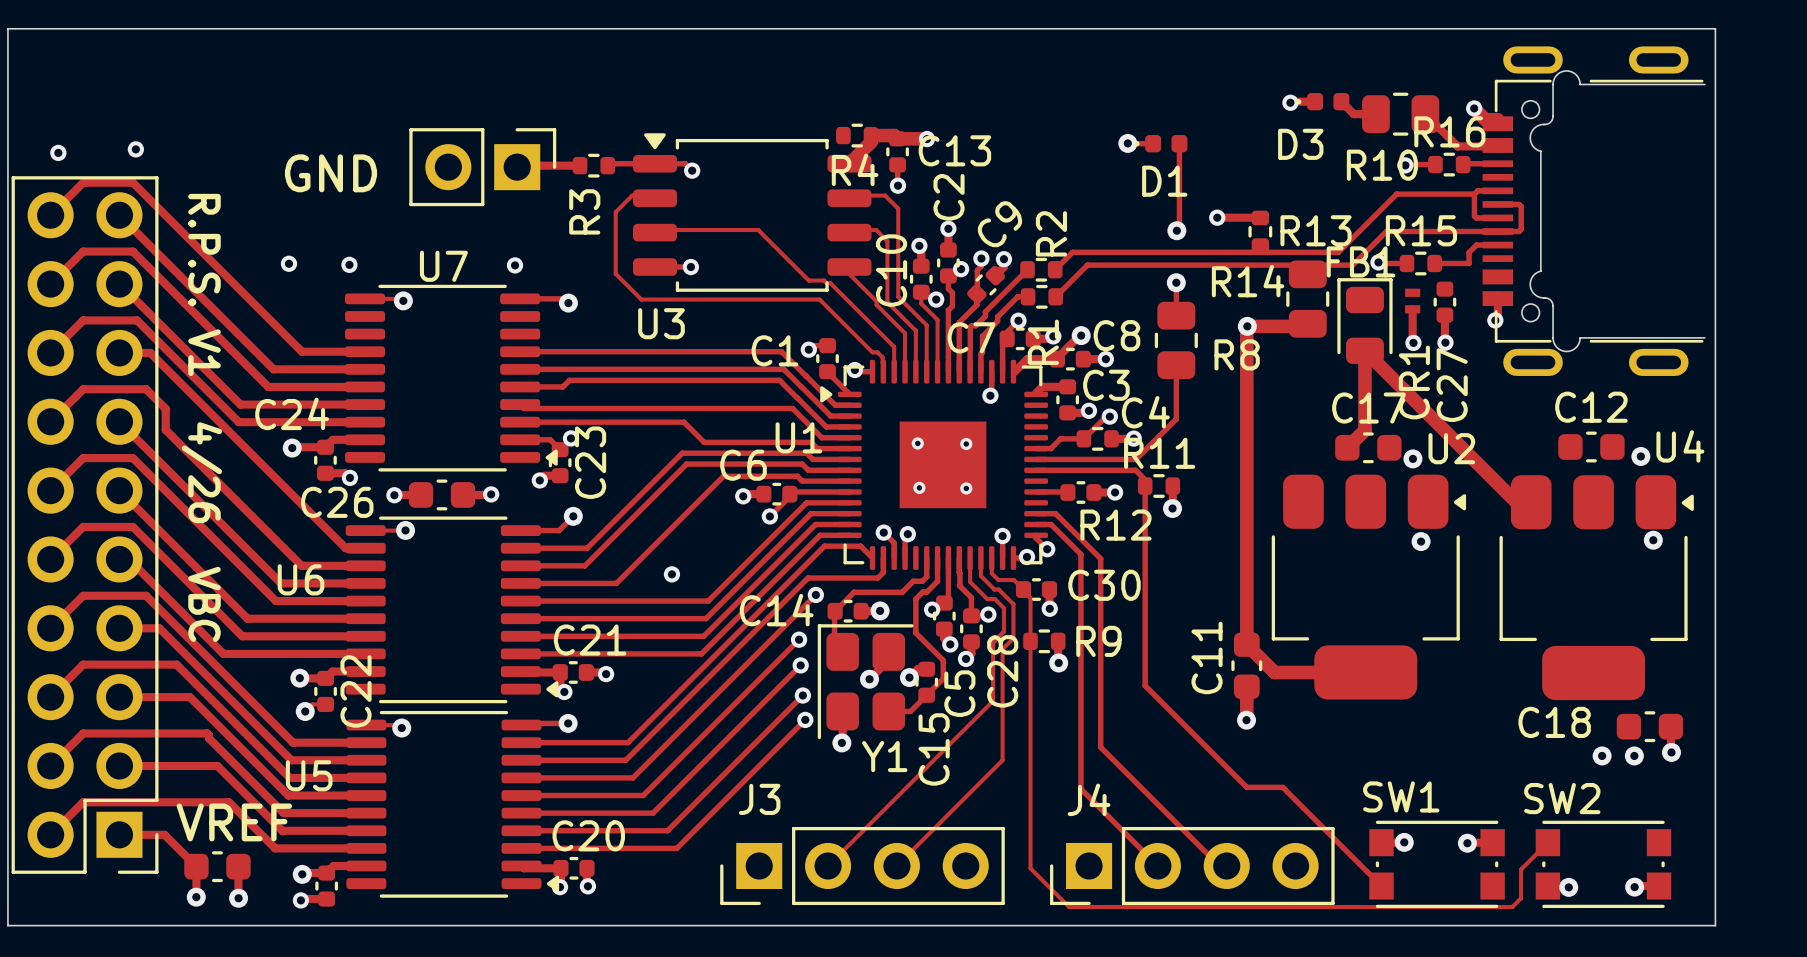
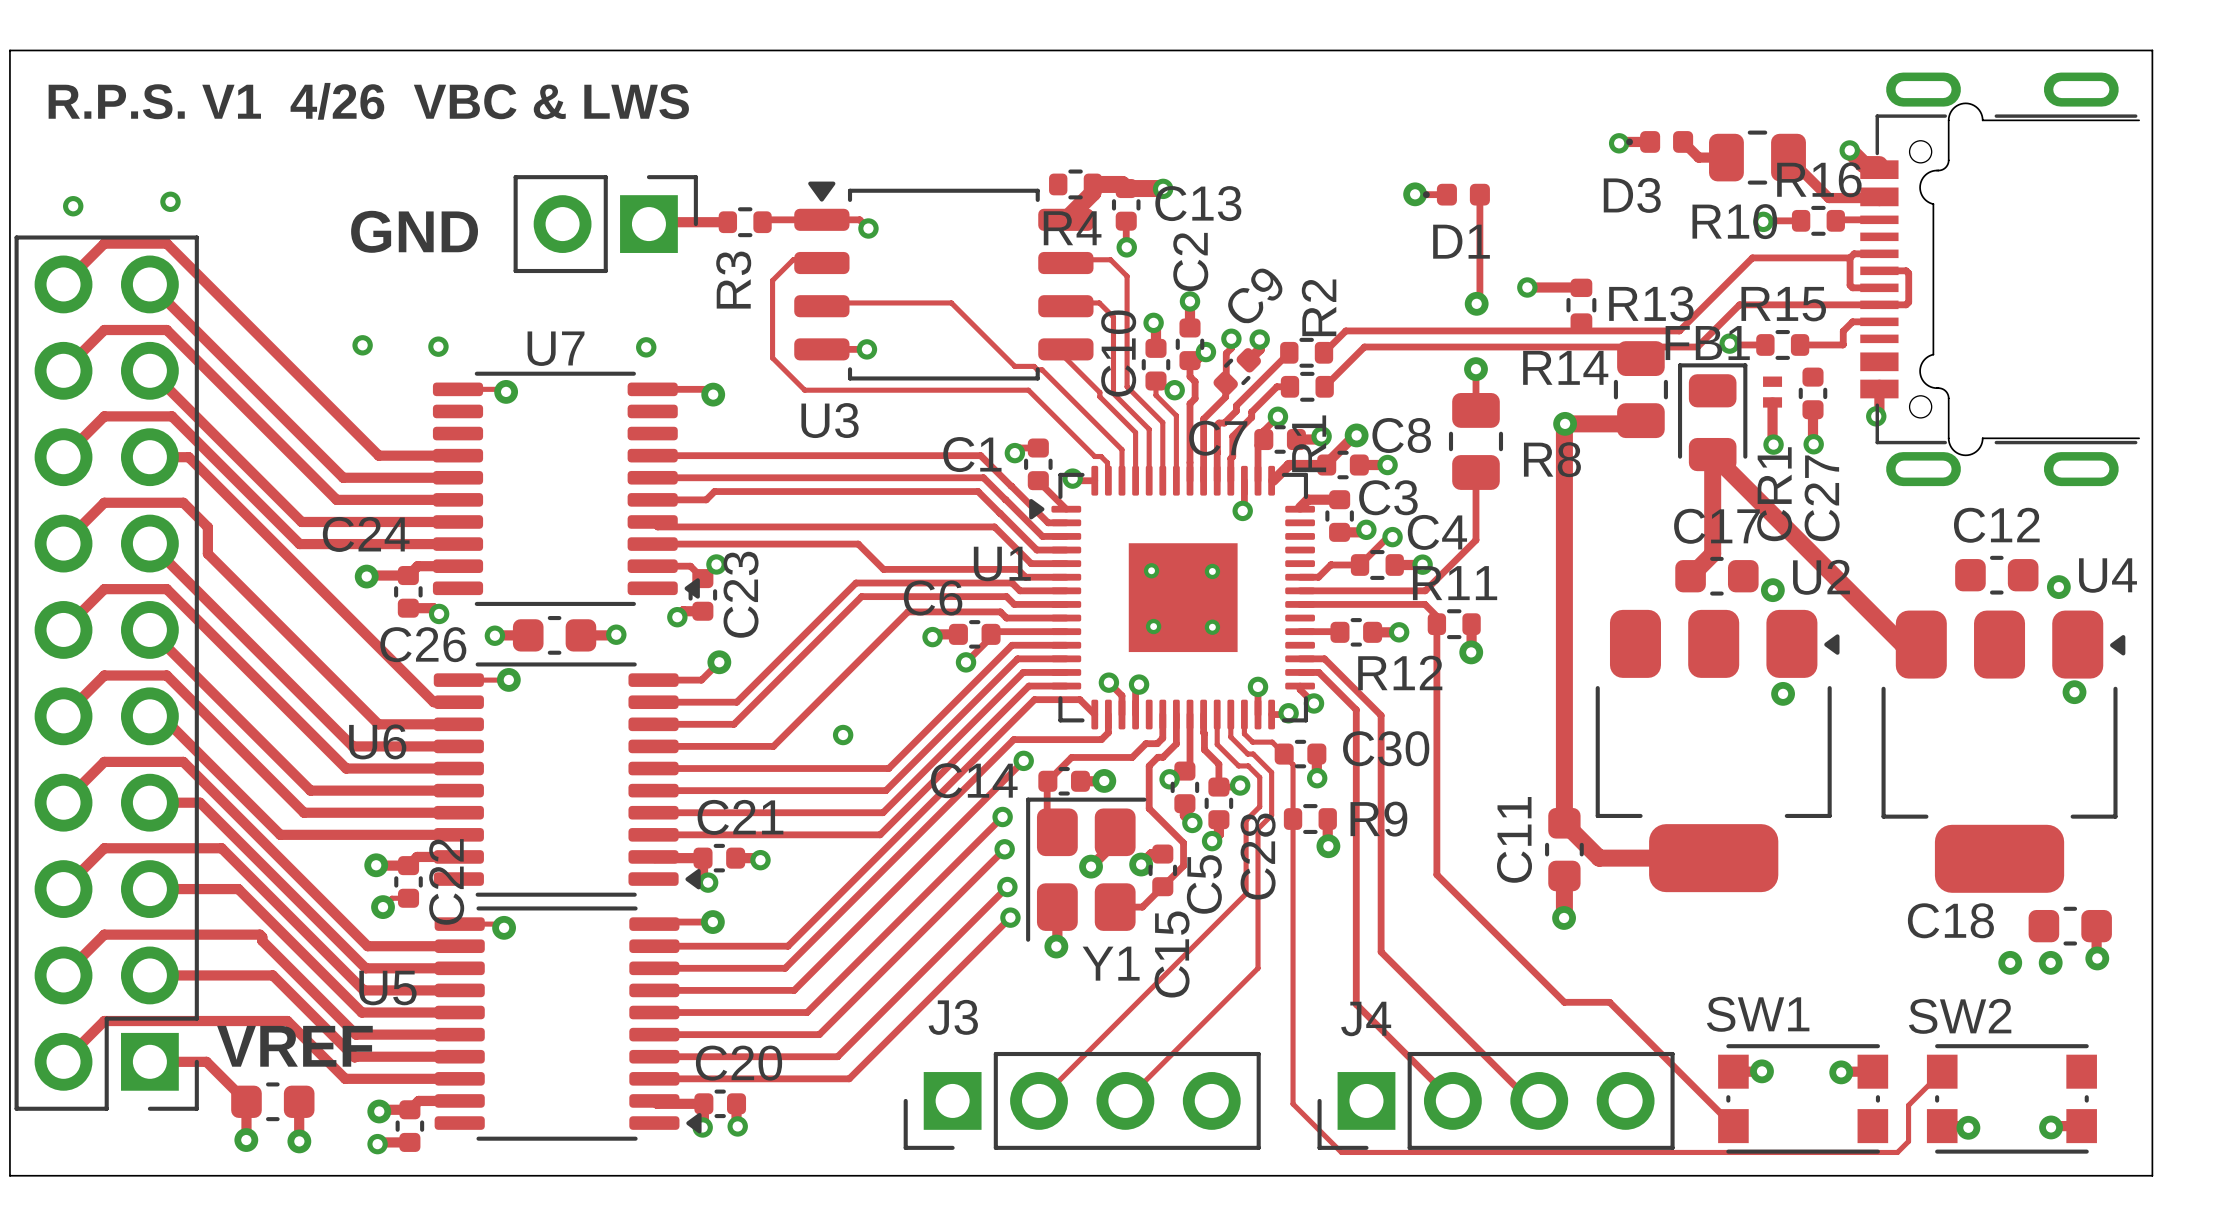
text: none -> R.P.S. V1 4/26 VBC & LWS (368, 101)
text: R.P.S. V1 4/26 VBC (201, 417) -> none

